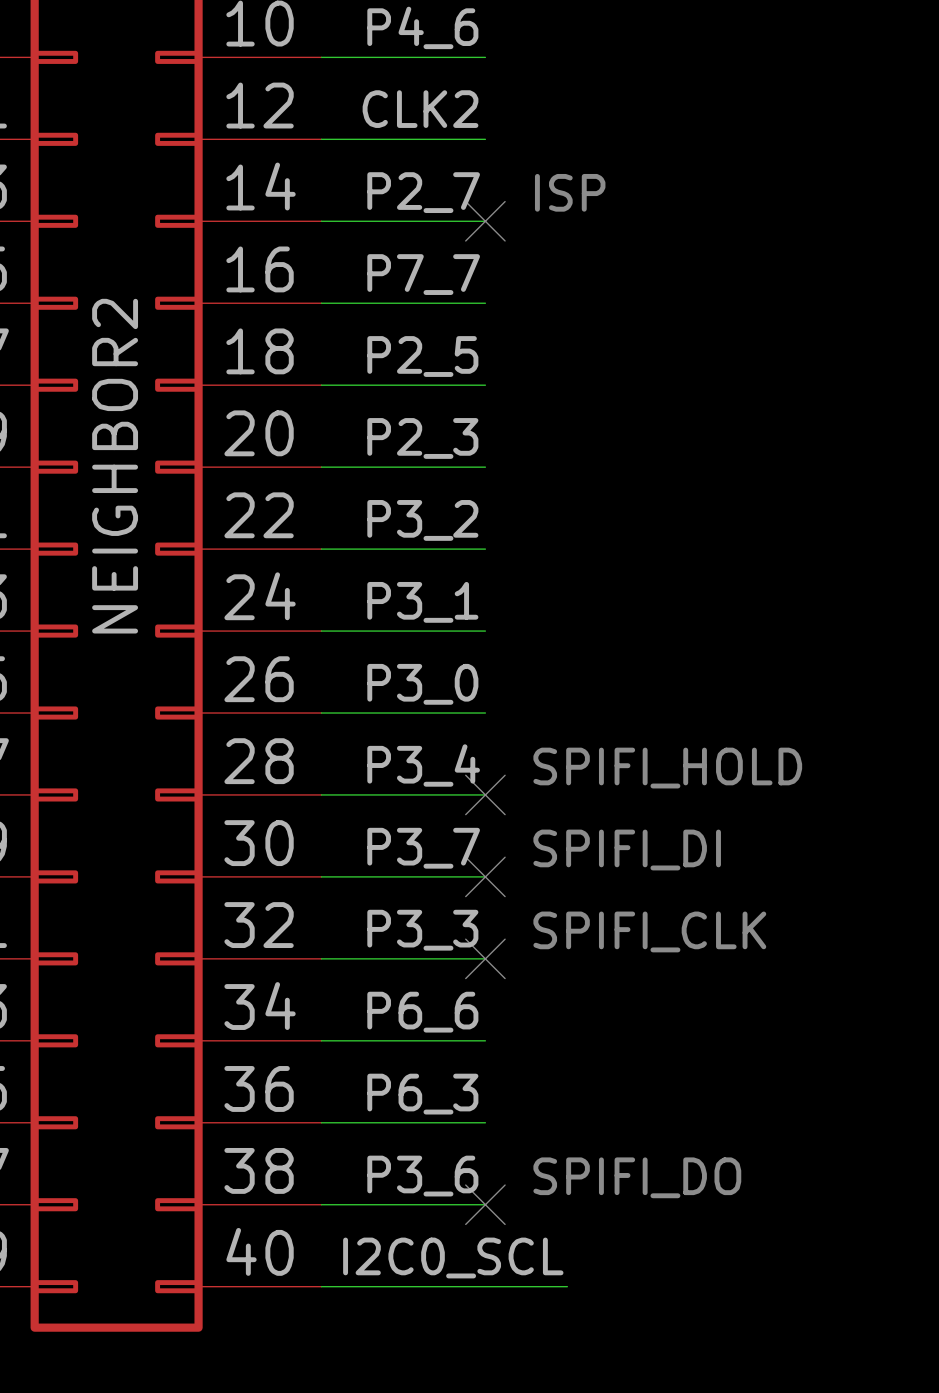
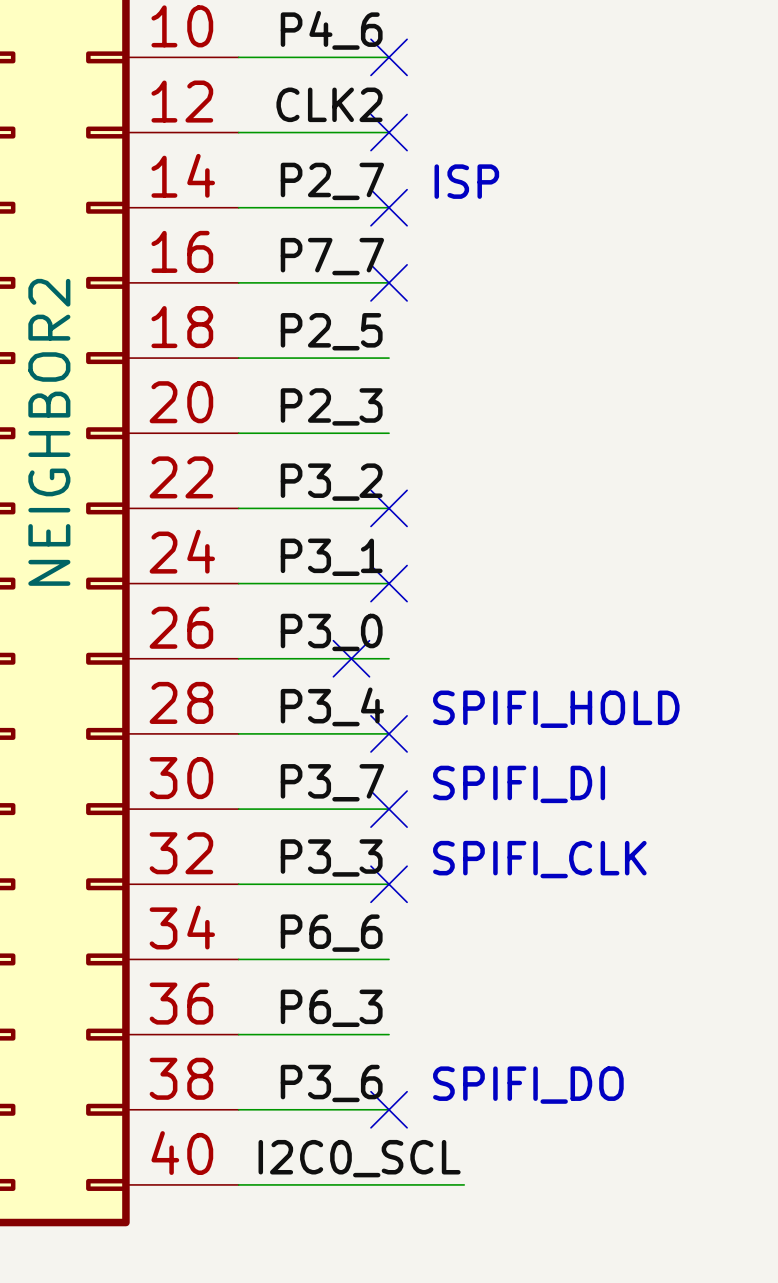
no-connect mark: none -> (389, 57)
no-connect mark: none -> (389, 132)
no-connect mark: none -> (389, 282)
no-connect mark: none -> (389, 508)
no-connect mark: none -> (389, 583)
no-connect mark: none -> (351, 658)

